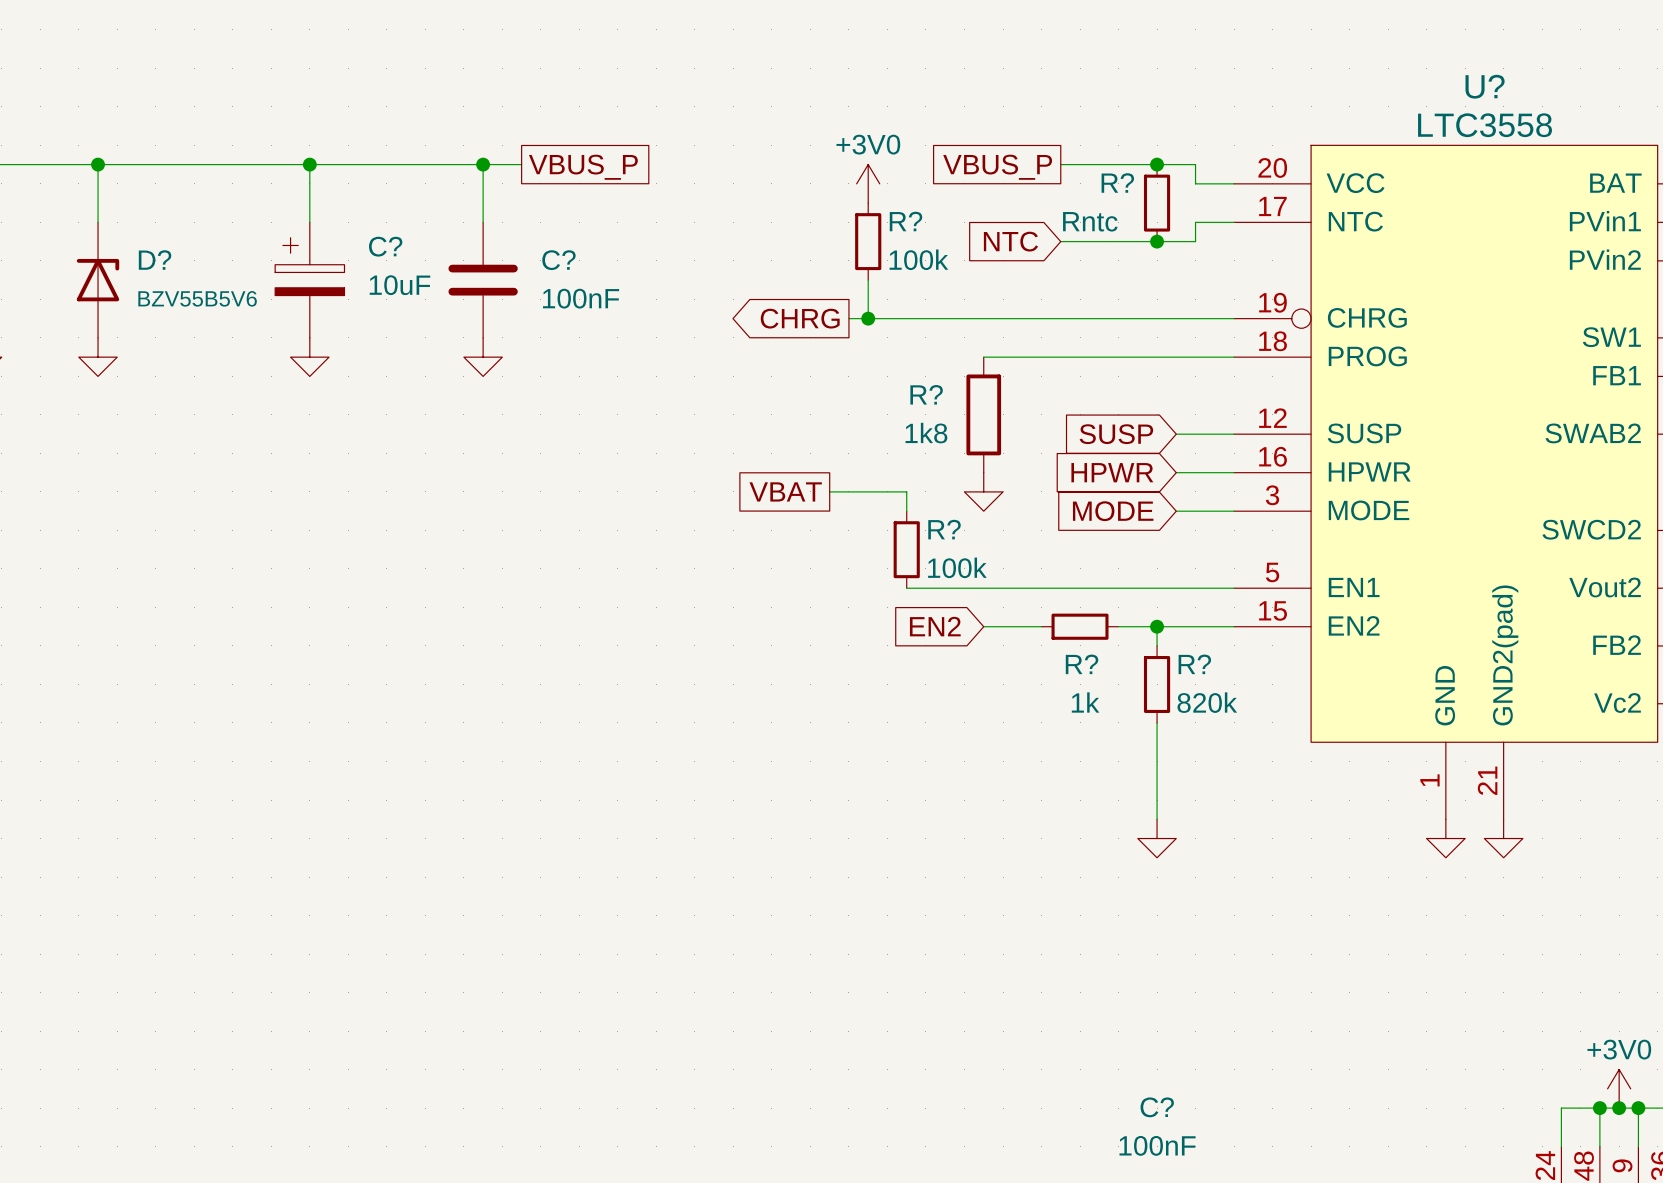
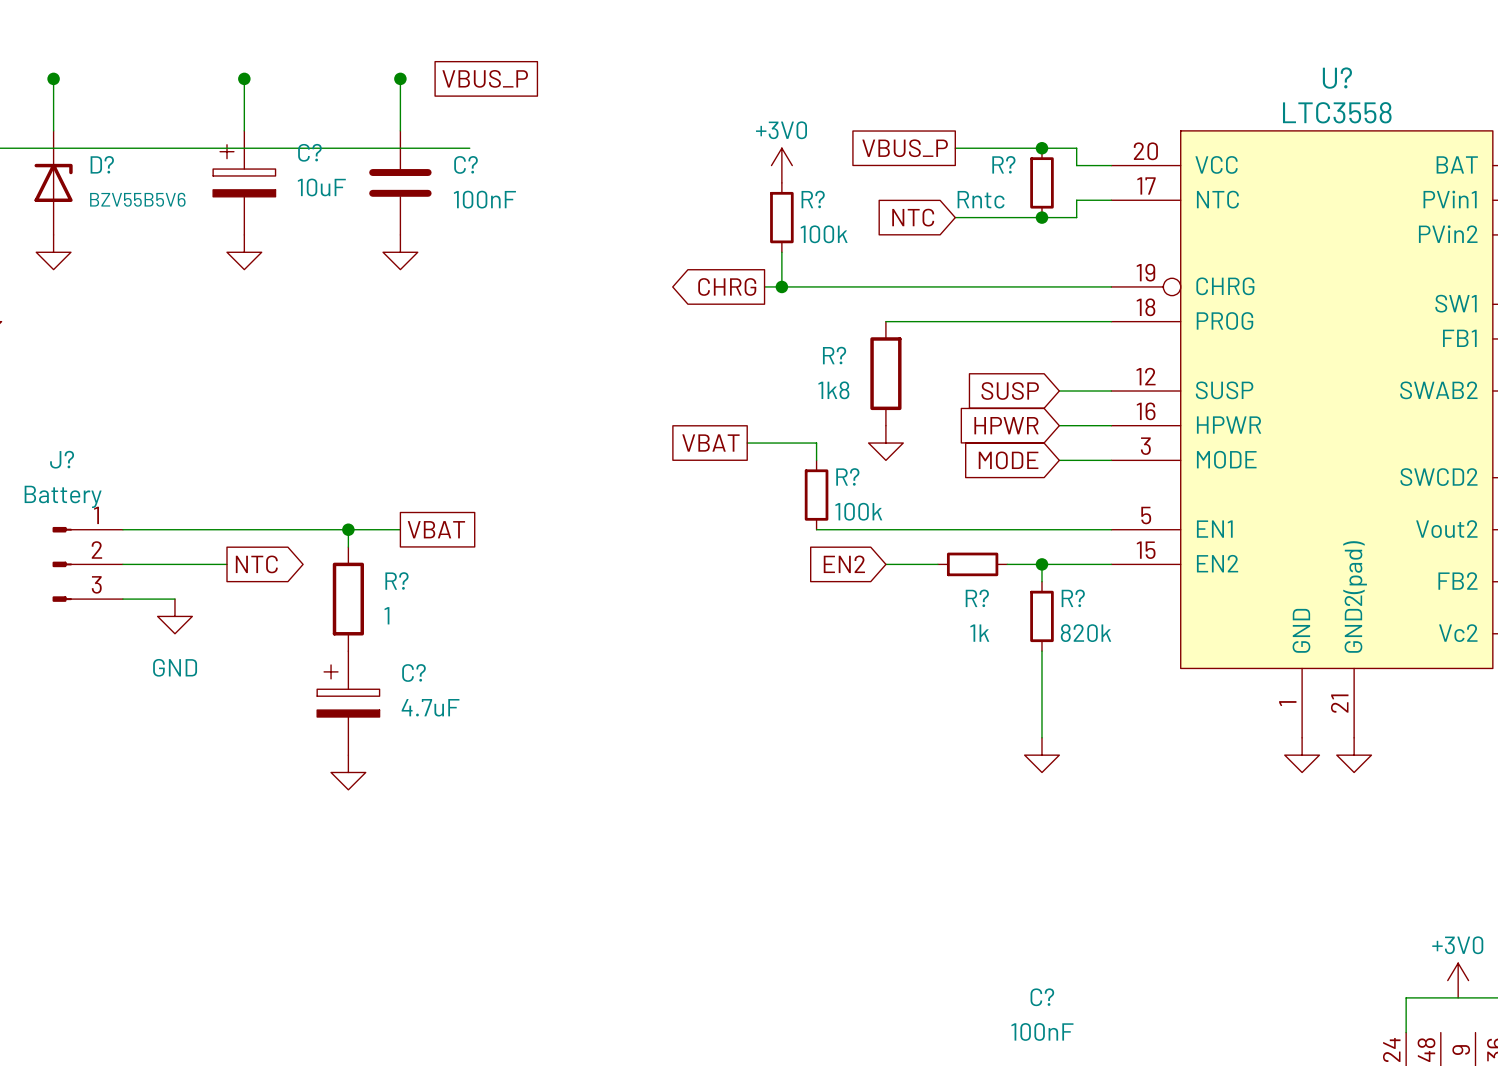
junction: none -> (53, 78)
junction: none -> (244, 78)
junction: none -> (400, 78)
wire: (98, 164) (98, 222) -> (53, 78) (53, 130)
junction: (98, 164) -> none
wire: (309, 164) (309, 222) -> (244, 78) (244, 130)
junction: (309, 164) -> none
wire: (483, 164) (483, 222) -> (400, 78) (400, 130)
junction: (483, 164) -> none
global label position: VBUS_P (583, 167) -> VBUS_P (485, 78)
power symbol: none -> (53, 252)
D? position: (98, 280) -> (53, 182)
power symbol: none -> (244, 252)
C? position: (309, 280) -> (244, 182)
power symbol: none -> (400, 252)
C? position: (483, 280) -> (400, 182)
power symbol: (98, 357) -> none
power symbol: (309, 357) -> none
power symbol: (483, 357) -> none
wire: none -> (122, 529) (400, 529)
wire: none -> (348, 529) (348, 547)
junction: none -> (348, 529)
global label: none -> VBAT (436, 529)
J?: none -> Battery (87, 564)
wire: none -> (122, 564) (226, 564)
global label: none -> NTC (256, 564)
wire: none -> (122, 599) (174, 599)
R?: none -> 1 (348, 599)
power symbol: none -> GND (174, 616)
C?: none -> 4.7uF (348, 703)
power symbol: none -> (348, 772)
wire: (1599, 1108) (1599, 1146) -> none
junction: (1599, 1108) -> none
junction: (1619, 1108) -> none
wire: (1638, 1108) (1638, 1146) -> none
junction: (1638, 1108) -> none

